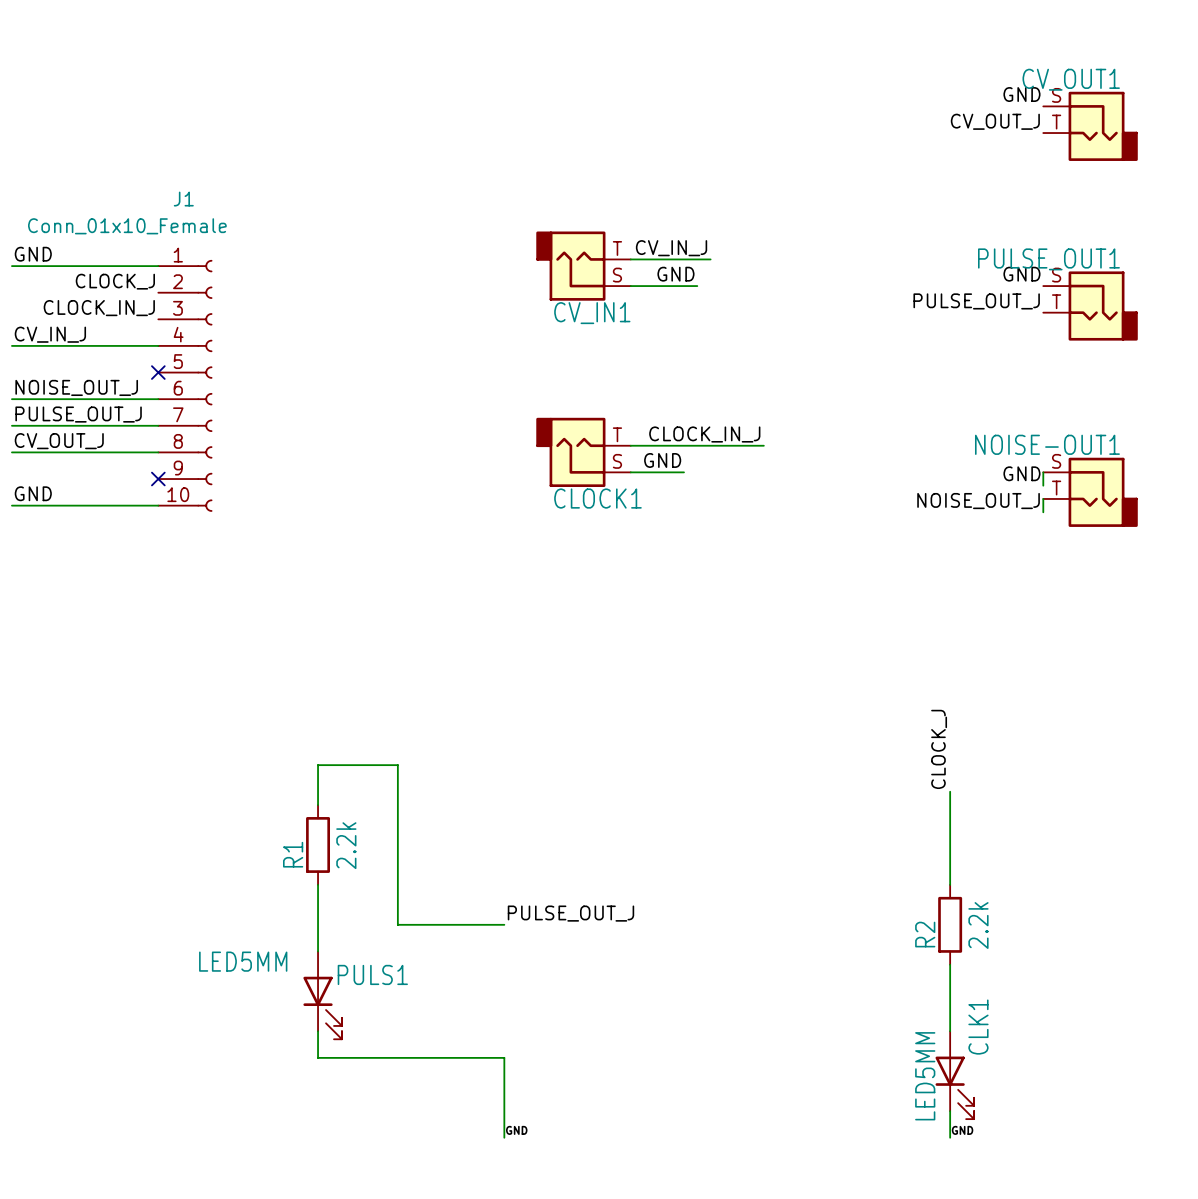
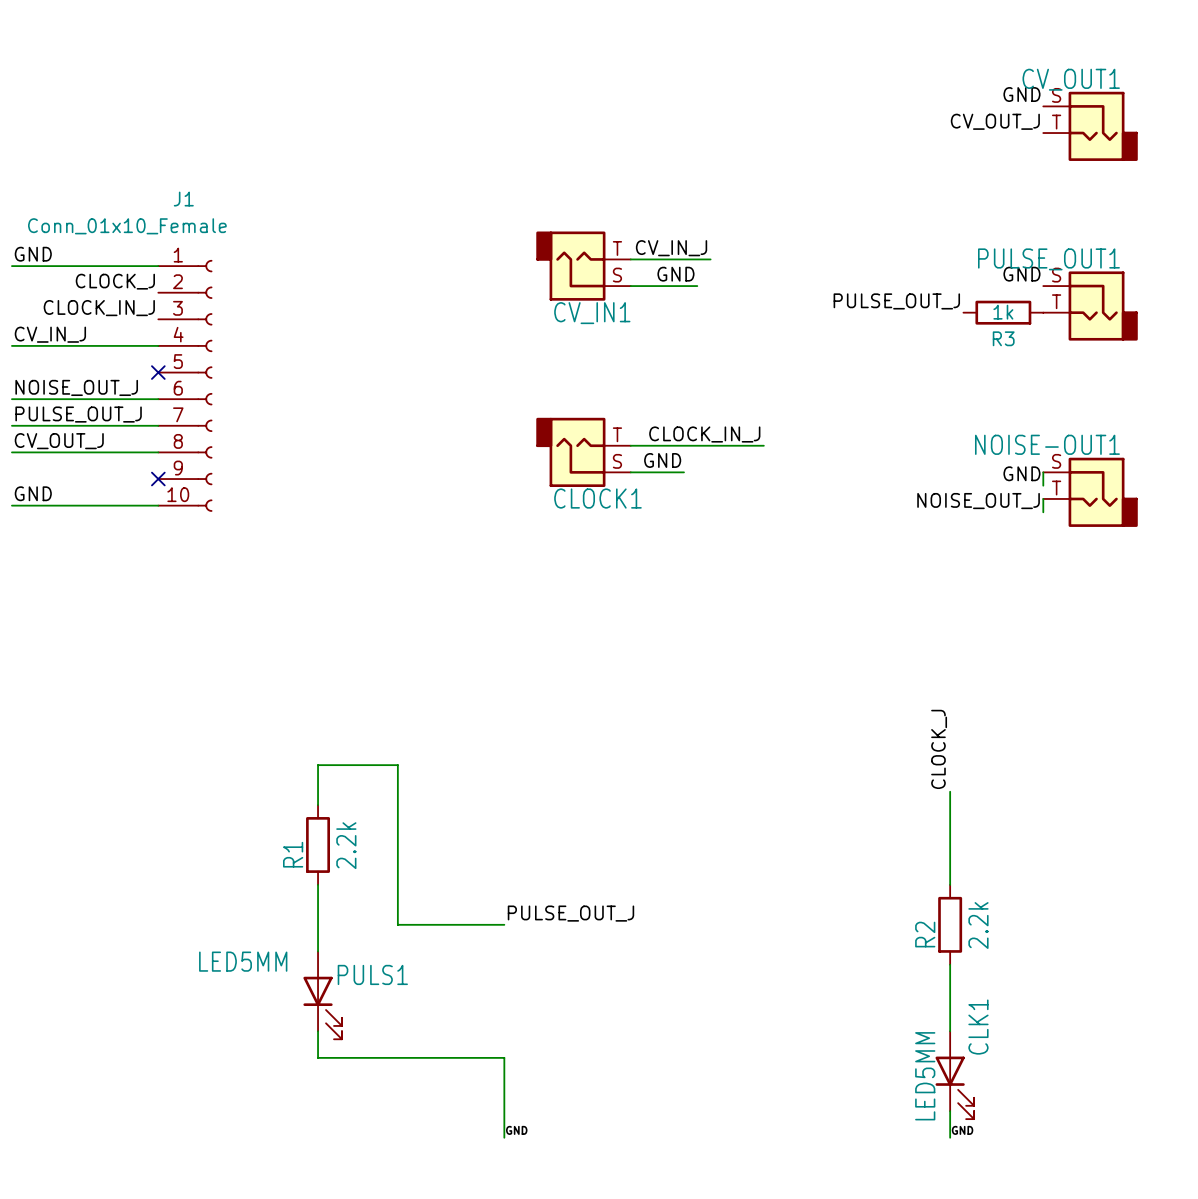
label position: PULSE_OUT_J (976, 301) -> PULSE_OUT_J (896, 301)
R3: none -> 1k (1003, 312)

